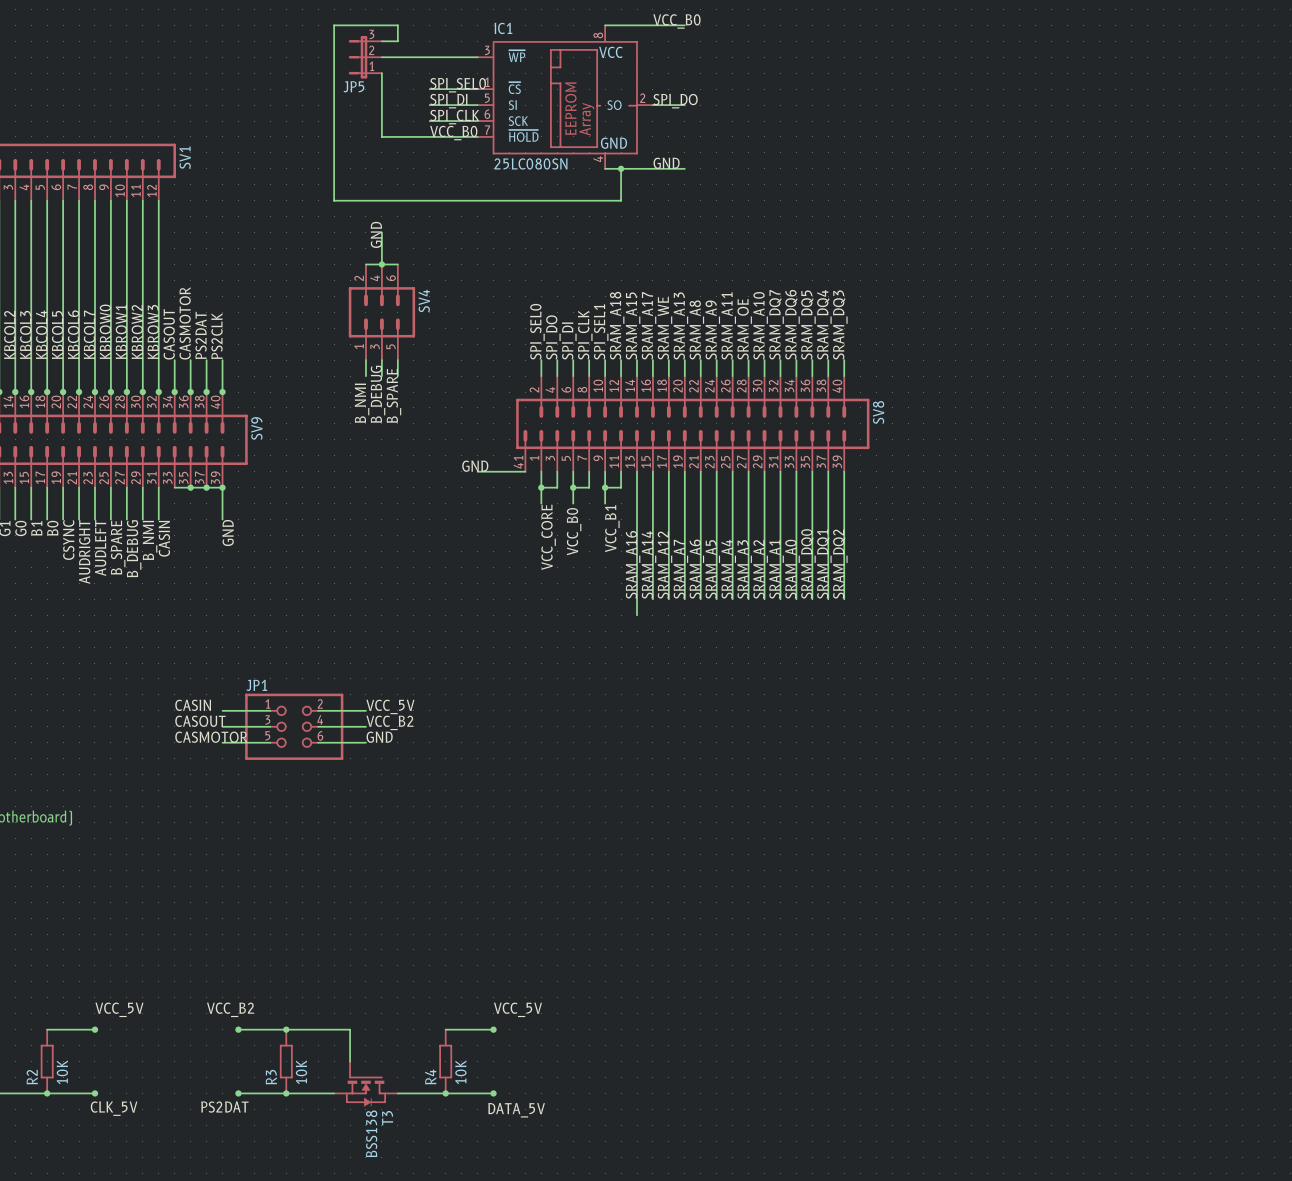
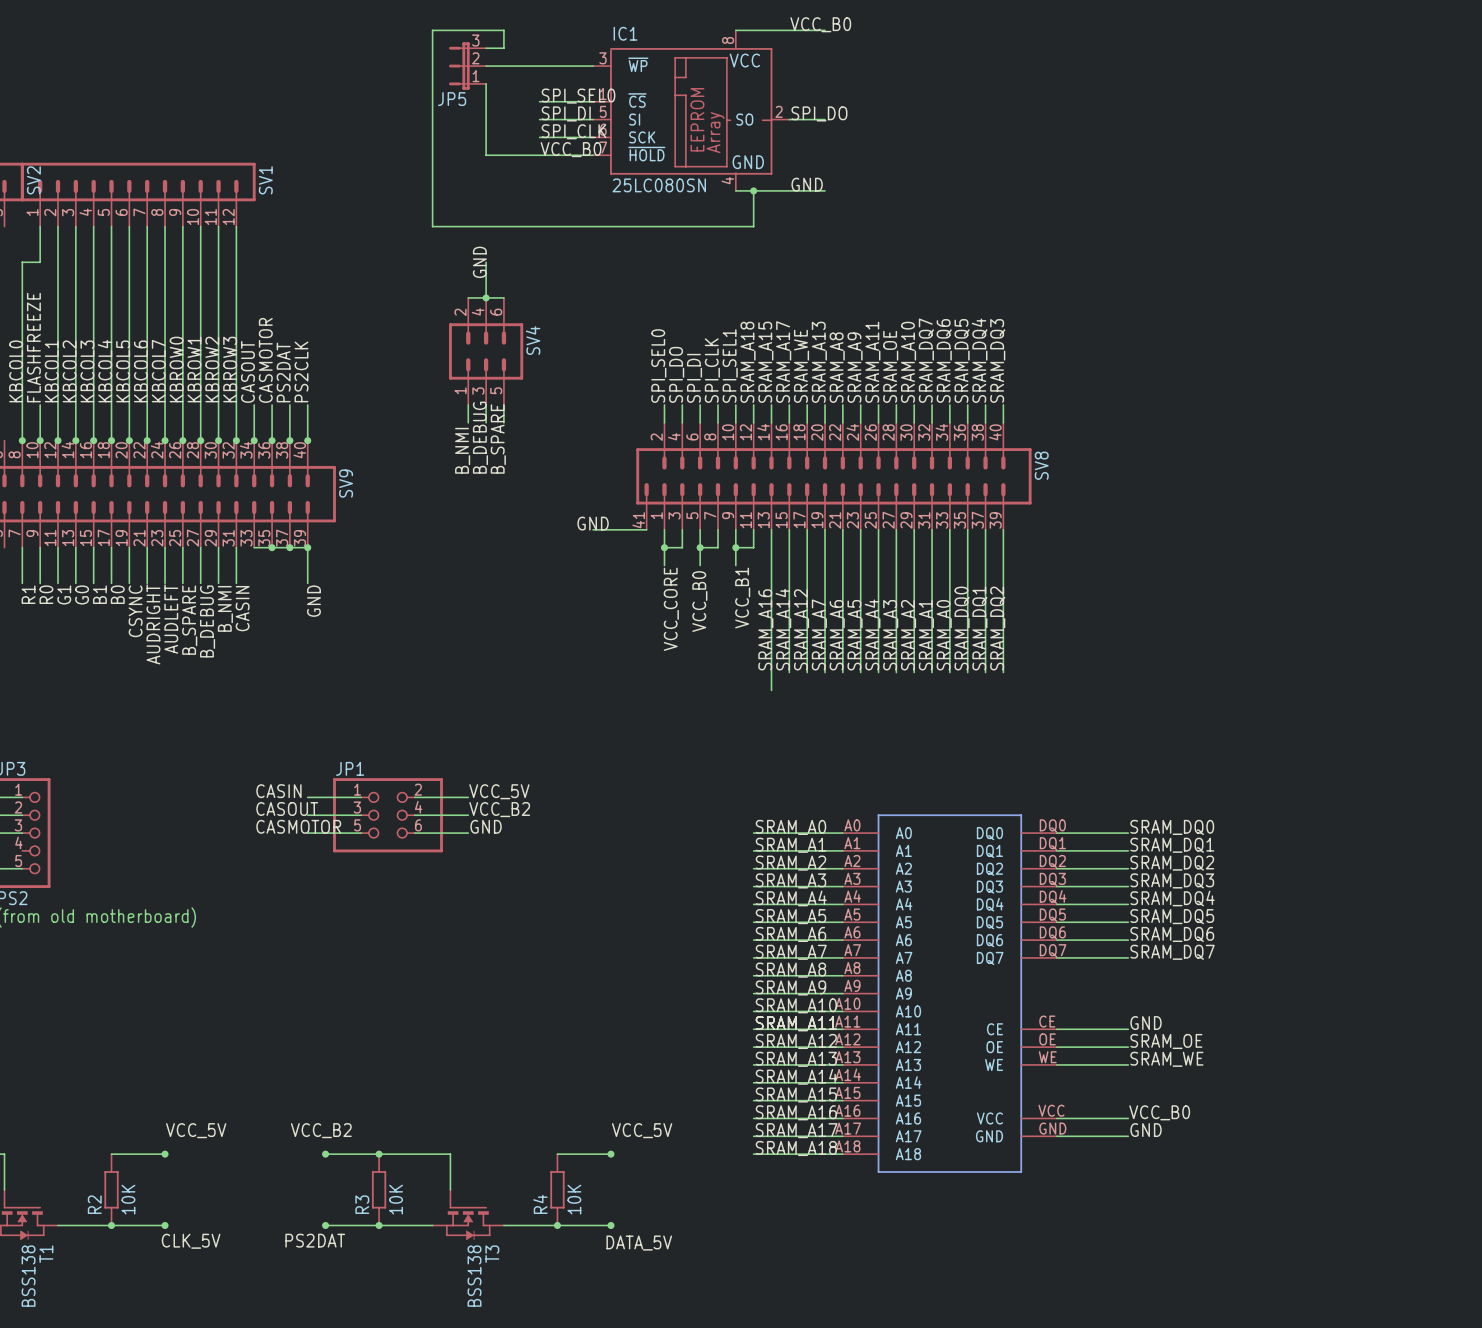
label: none -> SRAM_A0 (790, 827)
label: none -> SRAM_DQ0 (1172, 827)
wire: none -> (753, 833) (842, 833)
wire: none -> (1056, 833) (1128, 833)
label: none -> SRAM_A1 (790, 845)
label: none -> SRAM_DQ1 (1172, 845)
wire: none -> (753, 850) (842, 850)
wire: none -> (1056, 850) (1128, 850)
label: none -> SRAM_A2 (790, 863)
label: none -> SRAM_DQ2 (1172, 863)
wire: none -> (753, 868) (842, 868)
wire: none -> (1056, 868) (1128, 868)
label: none -> SRAM_A3 (790, 880)
label: none -> SRAM_DQ3 (1172, 880)
wire: none -> (753, 886) (842, 886)
wire: none -> (1056, 886) (1128, 886)
label: none -> SRAM_A4 (791, 898)
label: none -> SRAM_DQ4 (1172, 898)
wire: none -> (753, 904) (842, 904)
wire: none -> (1056, 904) (1128, 904)
label: none -> SRAM_A5 (790, 916)
label: none -> SRAM_DQ5 (1172, 916)
wire: none -> (753, 922) (842, 922)
wire: none -> (1056, 922) (1128, 922)
label: none -> SRAM_A6 (790, 934)
label: none -> SRAM_DQ6 (1172, 934)
wire: none -> (753, 940) (842, 940)
wire: none -> (1056, 940) (1128, 940)
label: none -> SRAM_A7 (791, 952)
label: none -> SRAM_DQ7 (1172, 952)
wire: none -> (753, 957) (842, 957)
wire: none -> (1056, 957) (1128, 957)
label: none -> SRAM_A8 (790, 970)
wire: none -> (753, 975) (842, 975)
label: none -> SRAM_A9 (790, 987)
wire: none -> (753, 993) (842, 993)
part: none -> (949, 993)
label: none -> SRAM_A10 (796, 1005)
wire: none -> (753, 1011) (842, 1011)
label: none -> GND (1146, 1023)
label: none -> SRAM_A11 (796, 1023)
wire: none -> (753, 1029) (842, 1029)
wire: none -> (1056, 1029) (1128, 1029)
label: none -> SRAM_A12 (796, 1041)
label: none -> SRAM_OE (1166, 1041)
wire: none -> (753, 1047) (842, 1047)
wire: none -> (1056, 1047) (1128, 1047)
label: none -> SRAM_A13 (796, 1059)
label: none -> SRAM_WE (1166, 1059)
wire: none -> (753, 1064) (842, 1064)
wire: none -> (1056, 1064) (1128, 1064)
label: none -> SRAM_A14 (796, 1076)
wire: none -> (753, 1082) (842, 1082)
label: none -> SRAM_A15 (796, 1094)
wire: none -> (753, 1100) (842, 1100)
label: none -> SRAM_A16 (796, 1112)
label: none -> VCC_B0 (1159, 1112)
wire: none -> (753, 1118) (842, 1118)
wire: none -> (1056, 1118) (1128, 1118)
label: none -> GND (1146, 1130)
label: none -> SRAM_A17 (796, 1130)
wire: none -> (753, 1136) (842, 1136)
wire: none -> (1056, 1136) (1128, 1136)
label: none -> SRAM_A18 (796, 1148)
wire: none -> (753, 1154) (842, 1154)

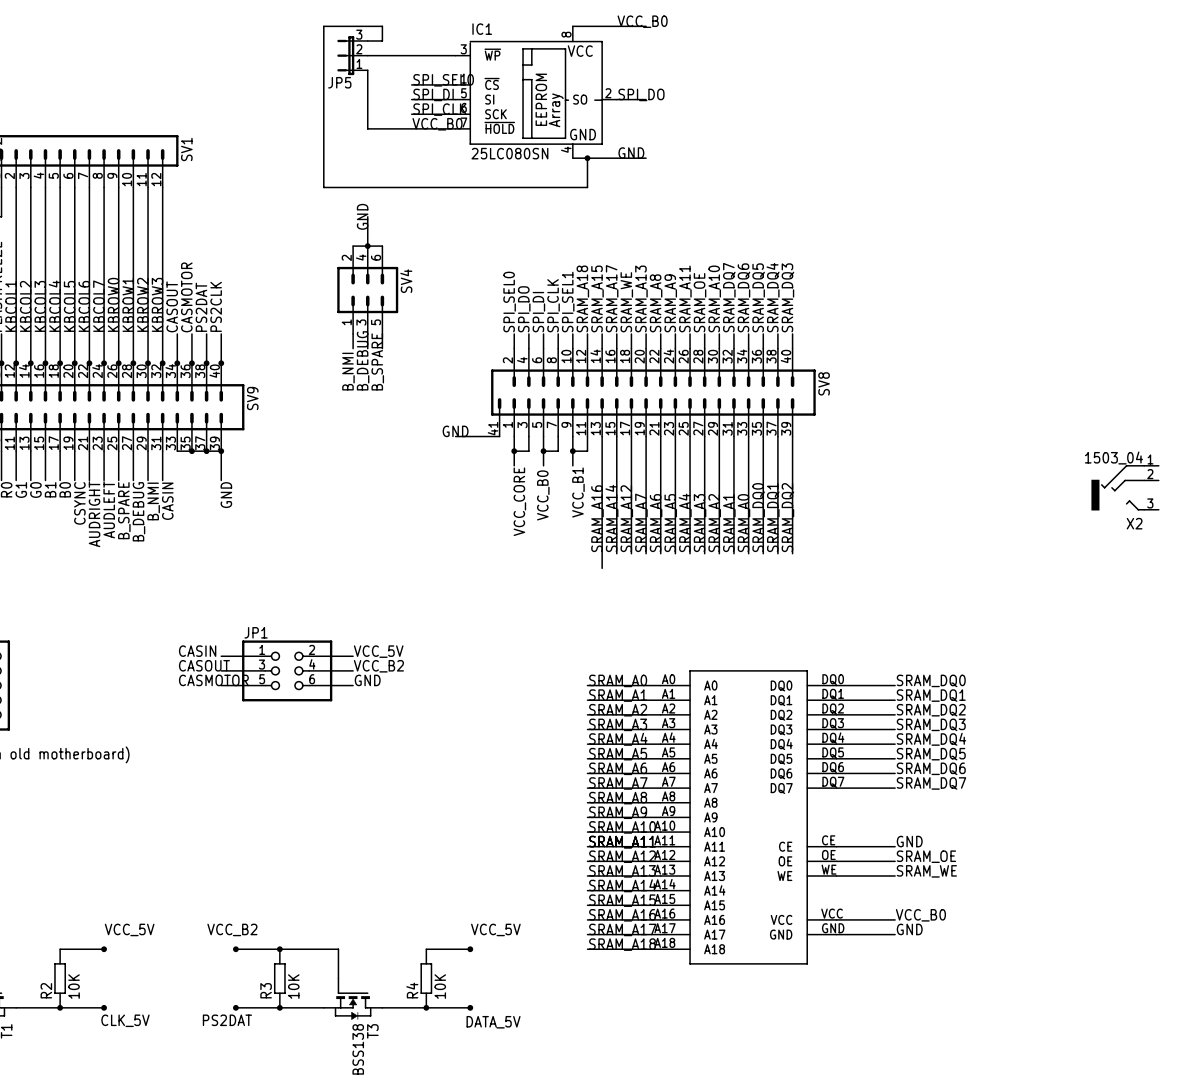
X2: none -> 1503_04 (1125, 487)

